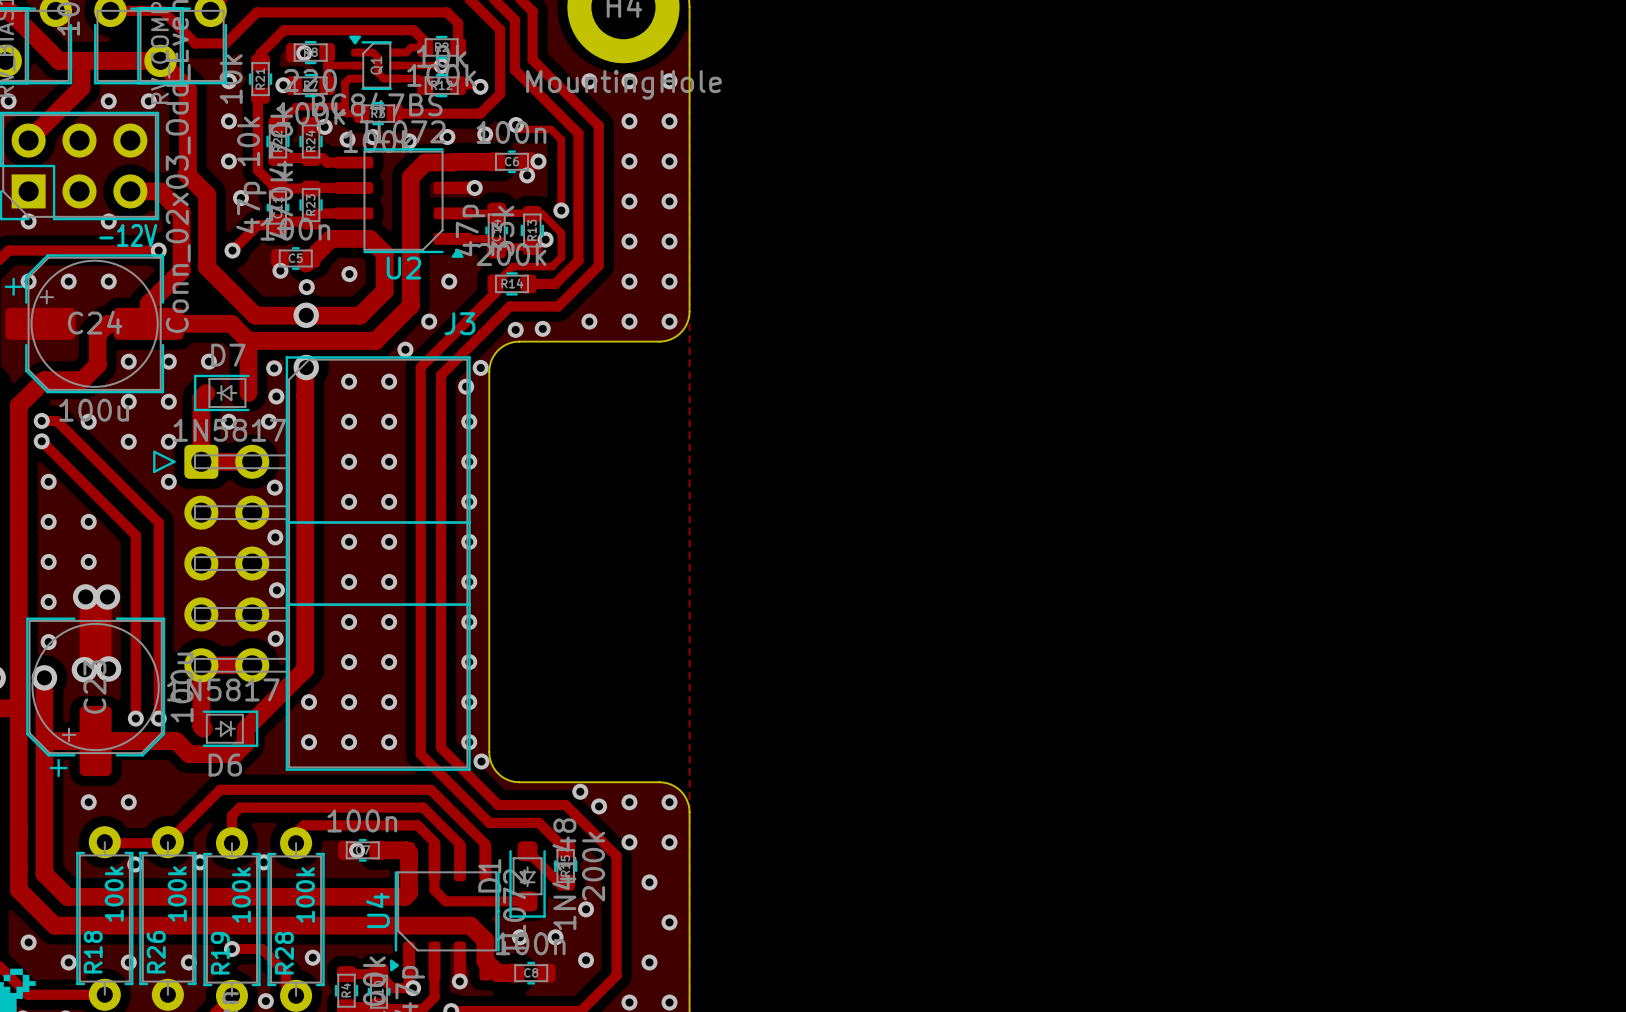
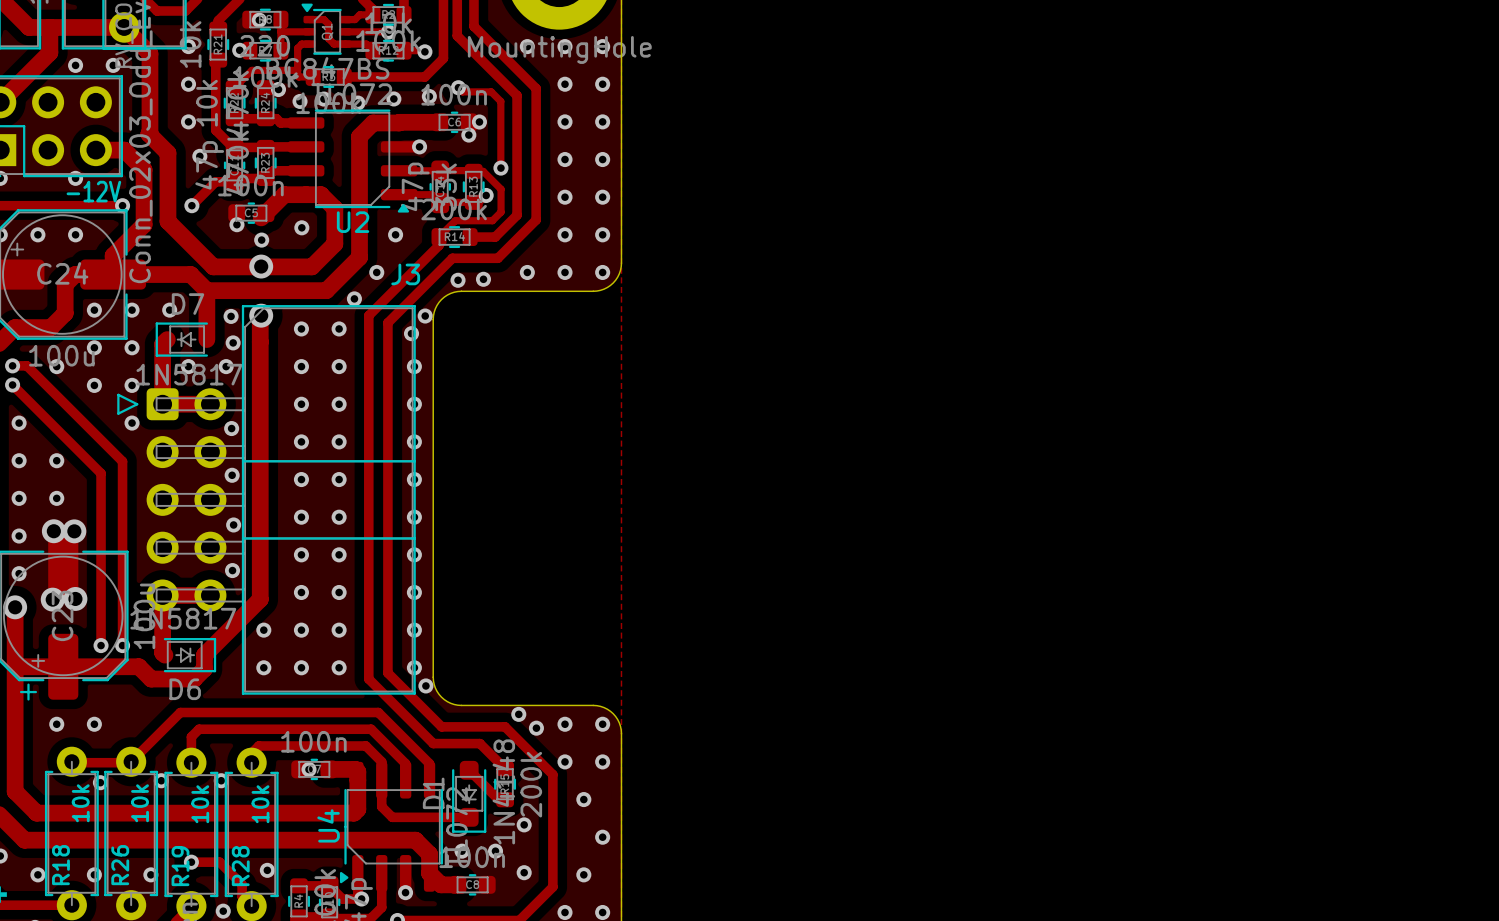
R18 value: 100k (114, 893) -> 10k (80, 803)
R26 value: 100k (177, 893) -> 10k (140, 803)
R19 value: 100k (241, 894) -> 10k (200, 804)
R28 value: 100k (305, 894) -> 10k (260, 804)

